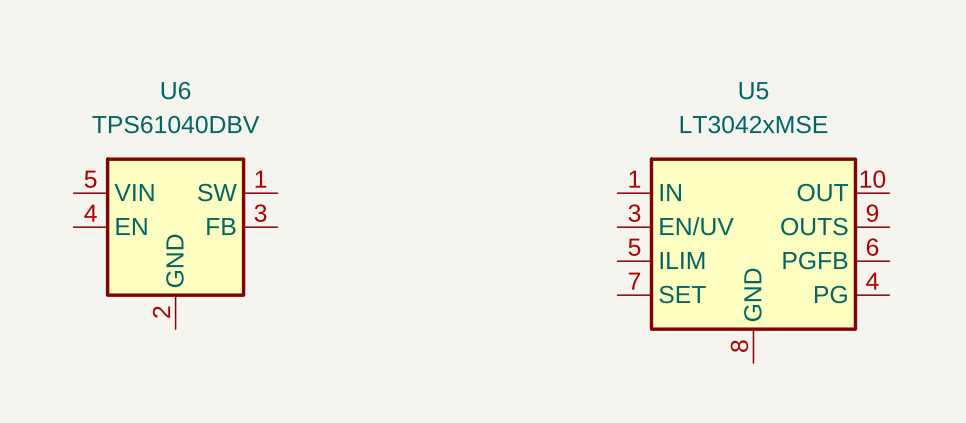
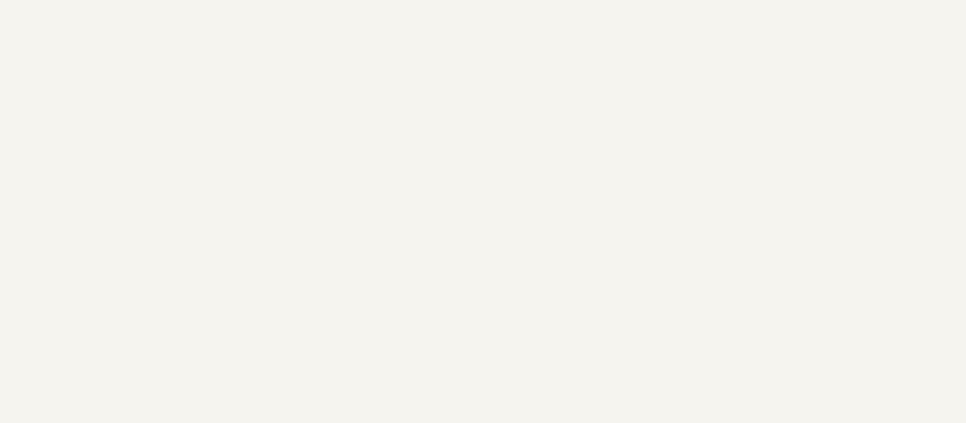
U6: TPS61040DBV (175, 243) -> none
U5: LT3042xMSE (753, 260) -> none

